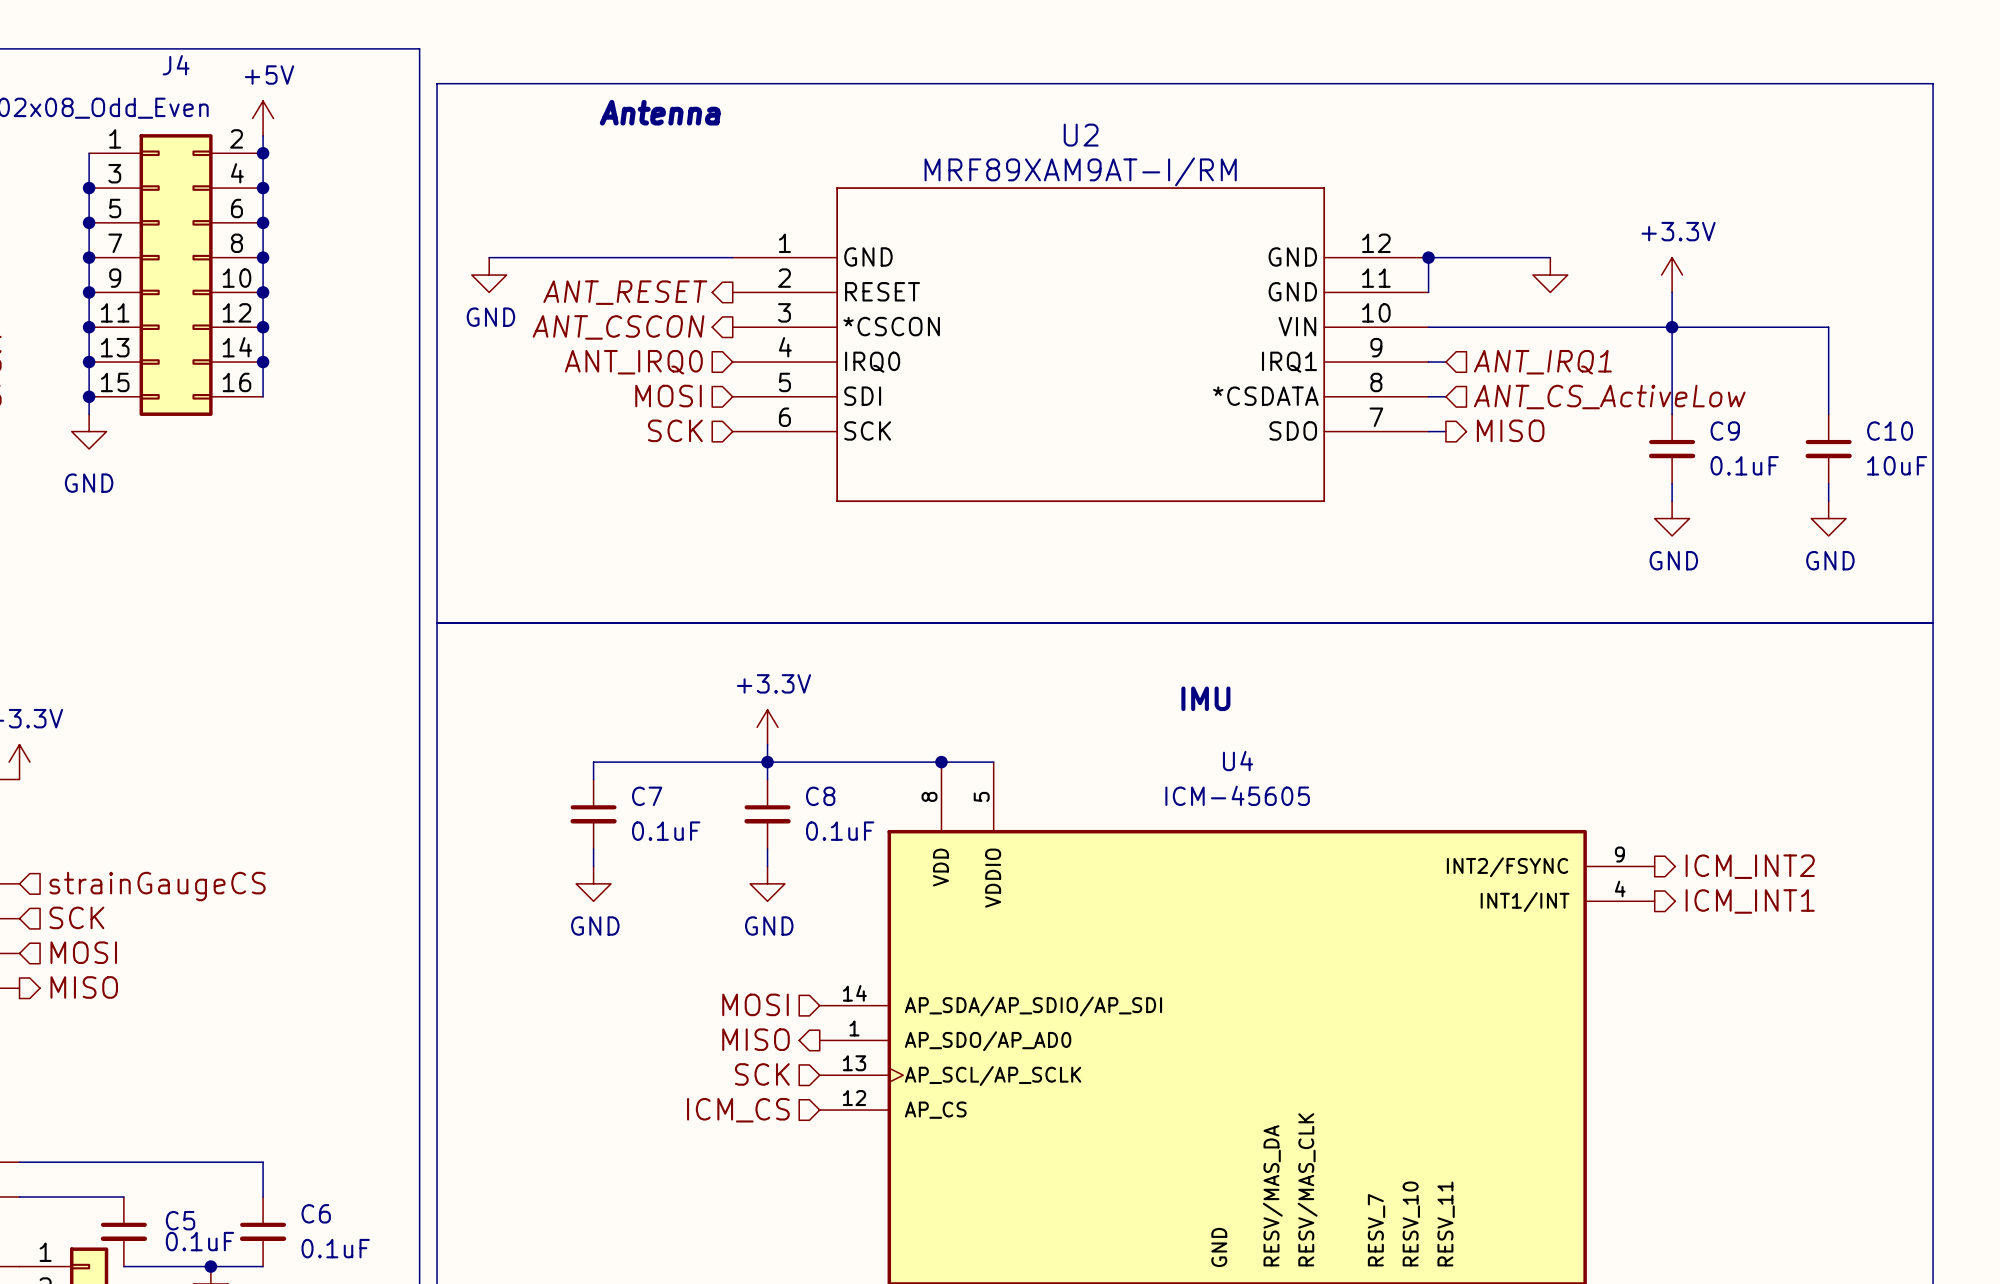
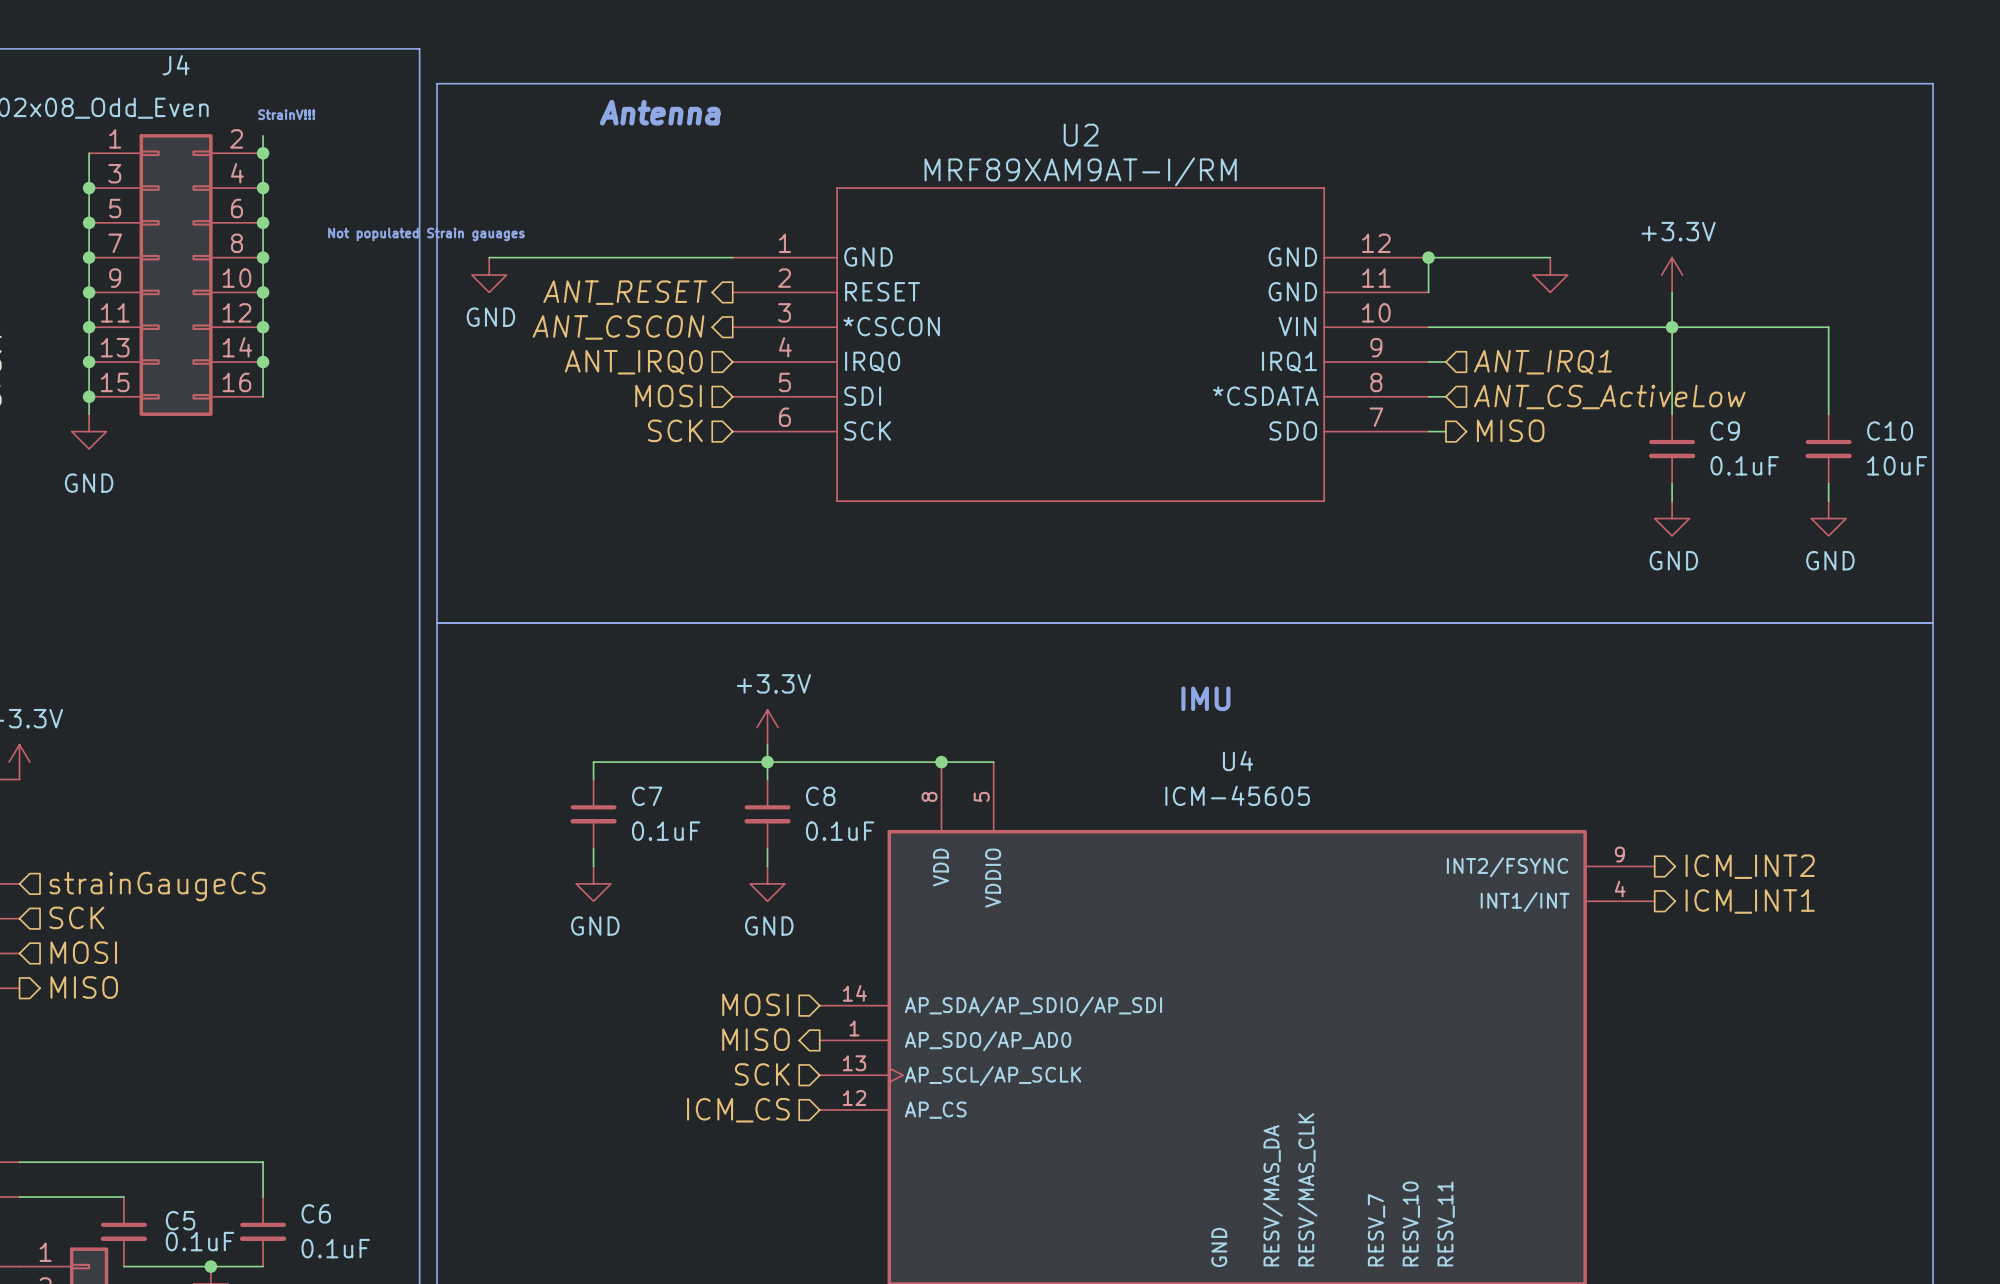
text: none -> StrainV!!! (286, 114)
power symbol: +5V (263, 118) -> none
text: none -> Not populated Strain gauages (426, 234)

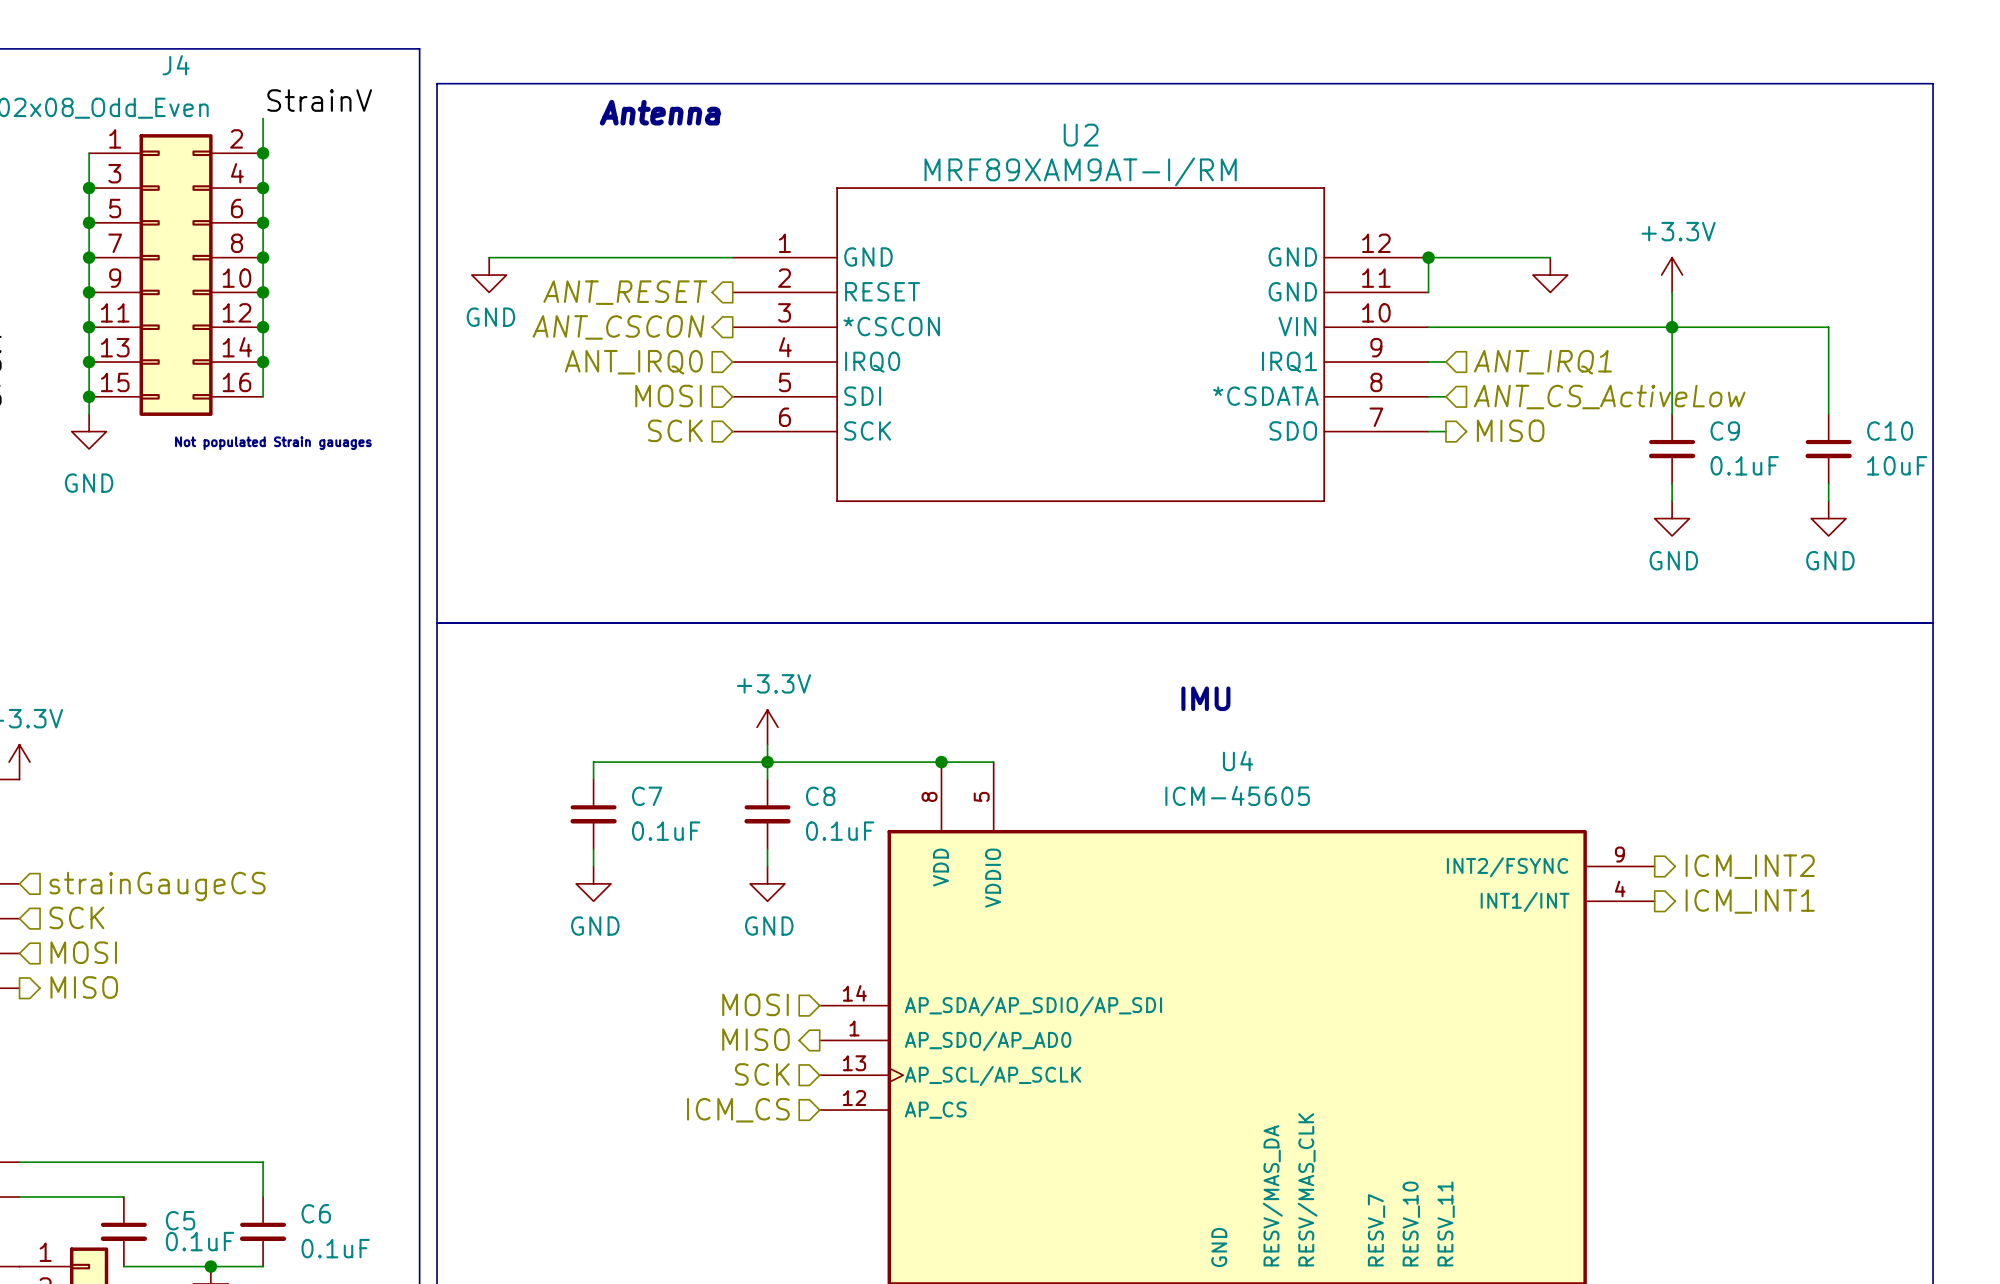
label: none -> StrainV (319, 100)
text: StrainV!!! (286, 114) -> none
wire: none -> (263, 118) (263, 135)
text position: Not populated Strain gauages (426, 234) -> Not populated Strain gauages (273, 443)

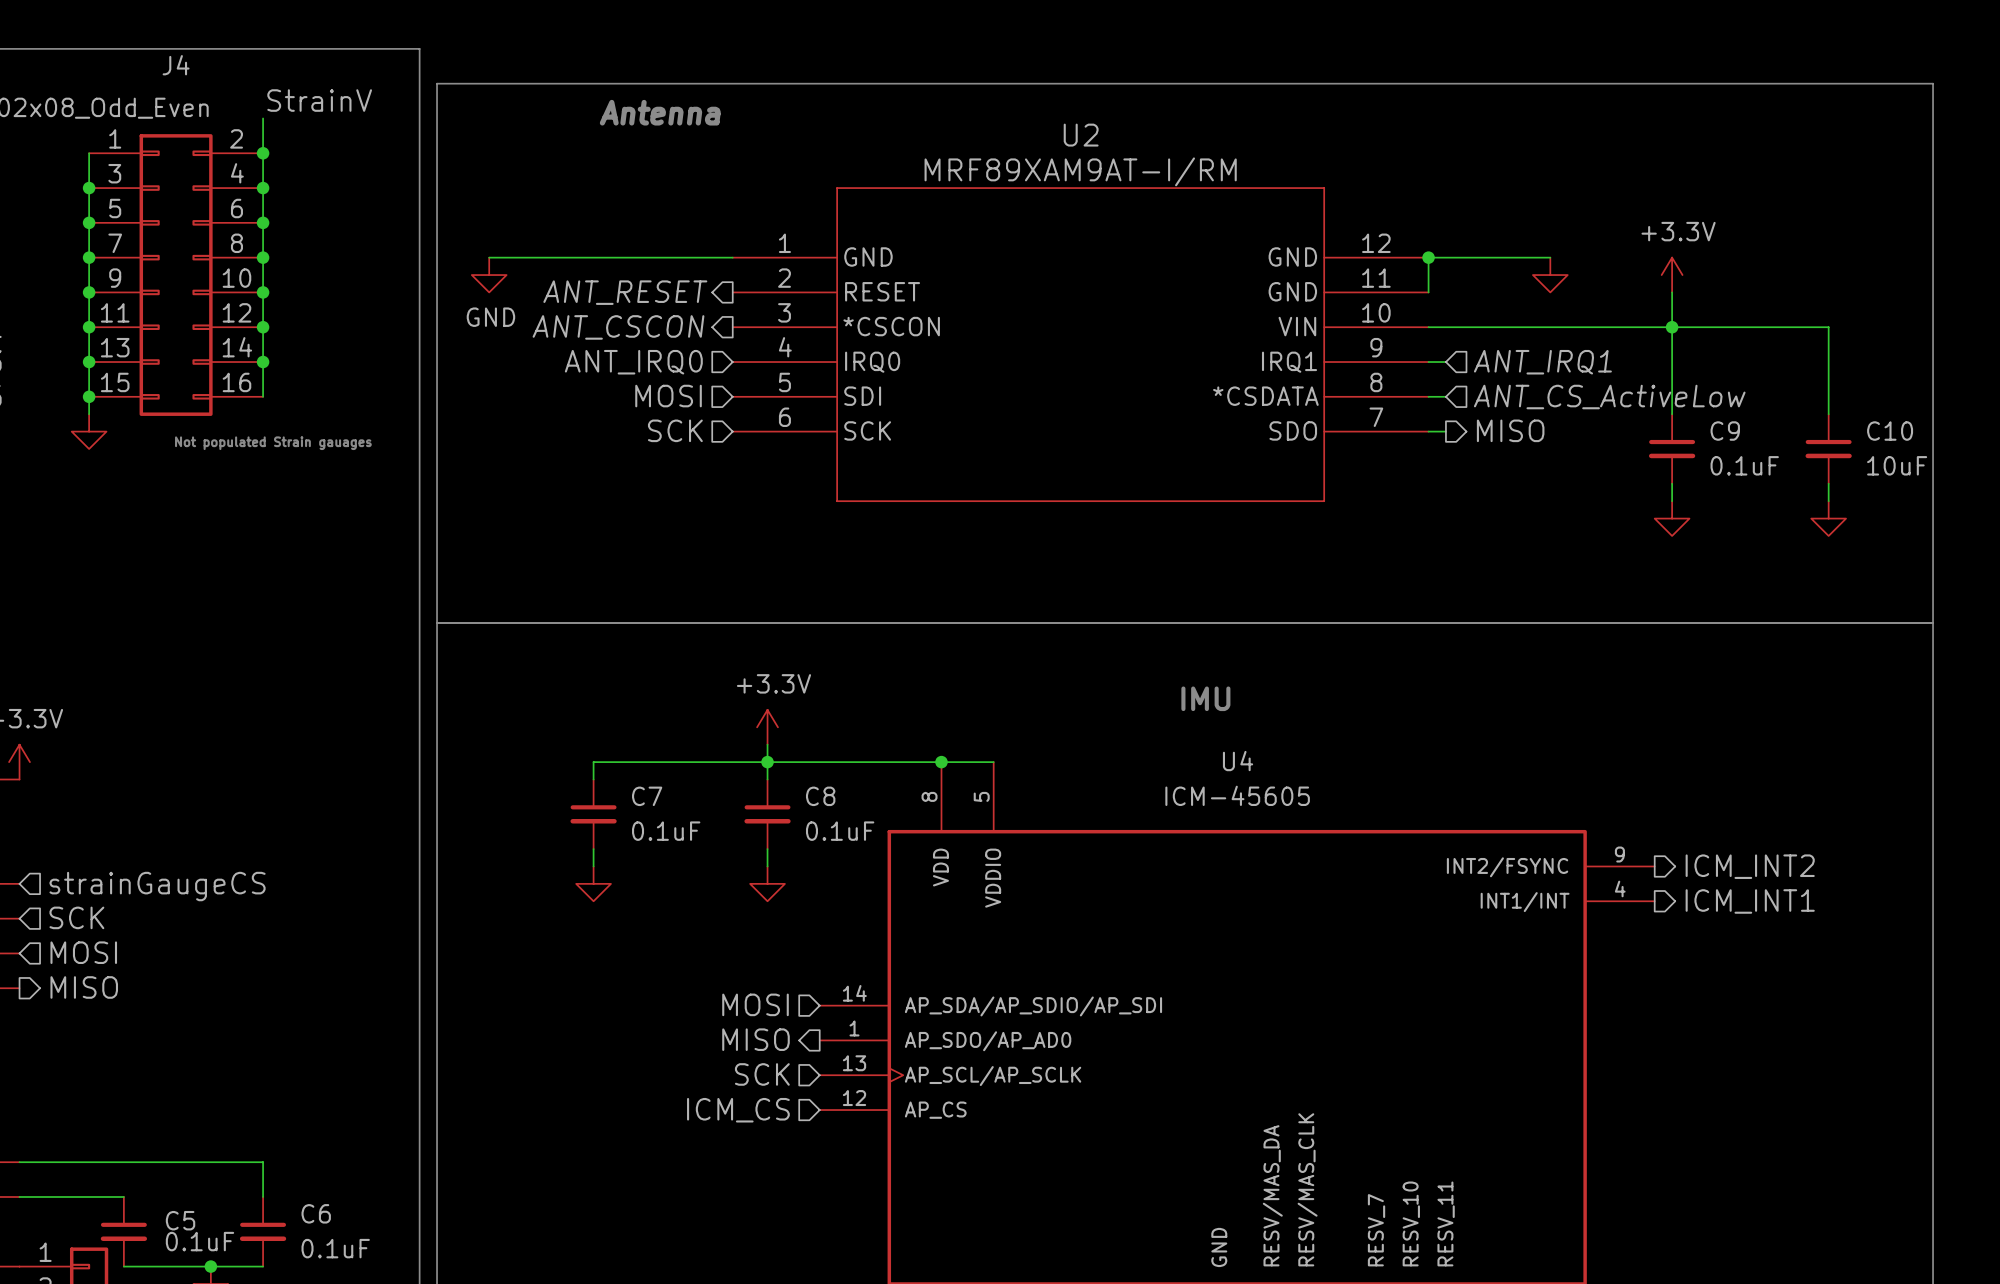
power symbol text: GND (89, 483) -> none
power symbol text: GND (1673, 560) -> none
power symbol text: GND (1830, 560) -> none
power symbol text: GND (595, 926) -> none
power symbol text: GND (769, 926) -> none

